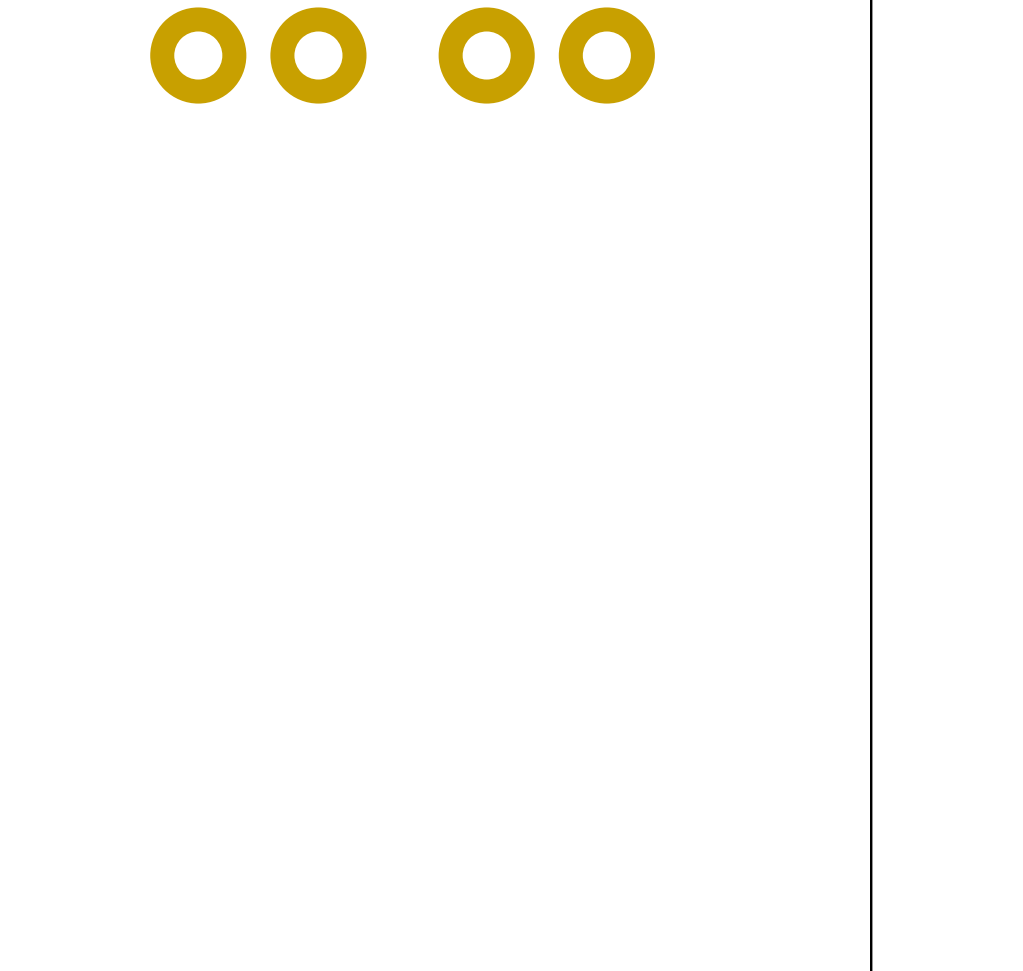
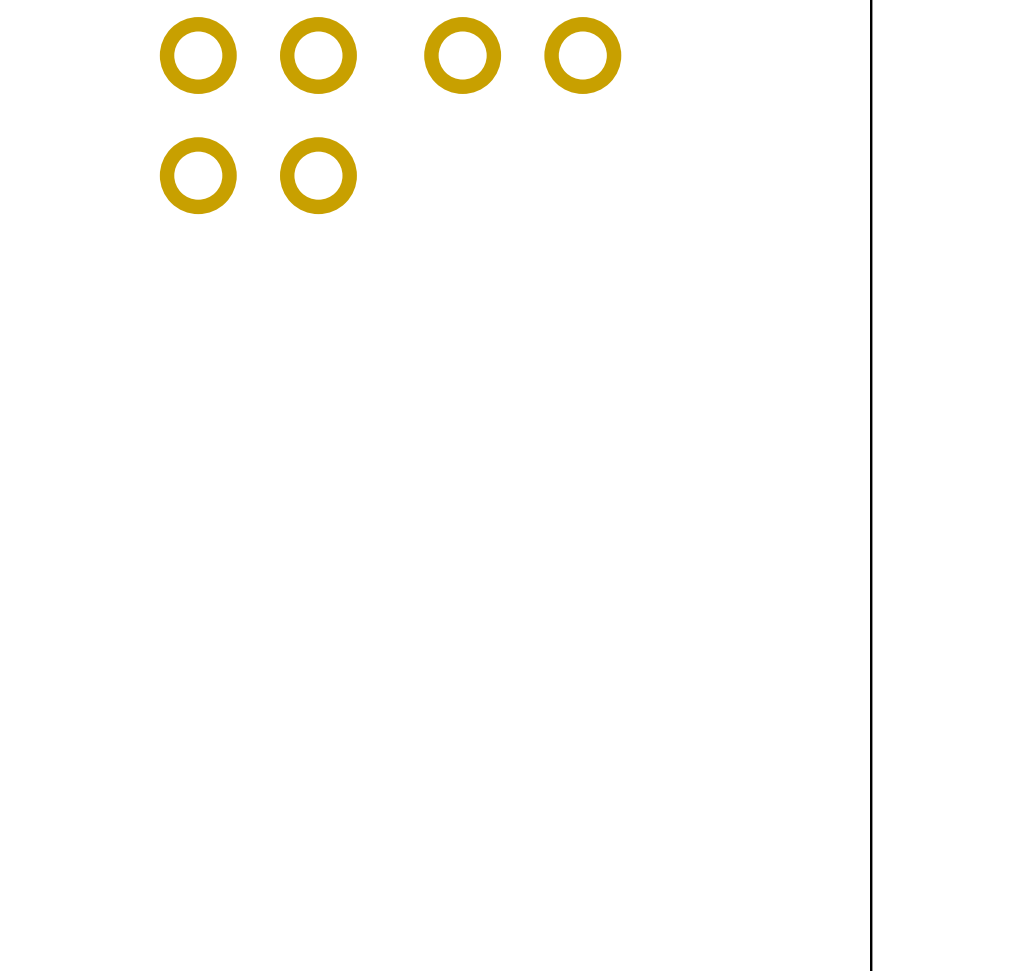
part footprint: [150, 7, 367, 104] -> [159, 17, 357, 94]
part footprint: [438, 7, 655, 104] -> [424, 17, 622, 94]
part: none -> (258, 175)

